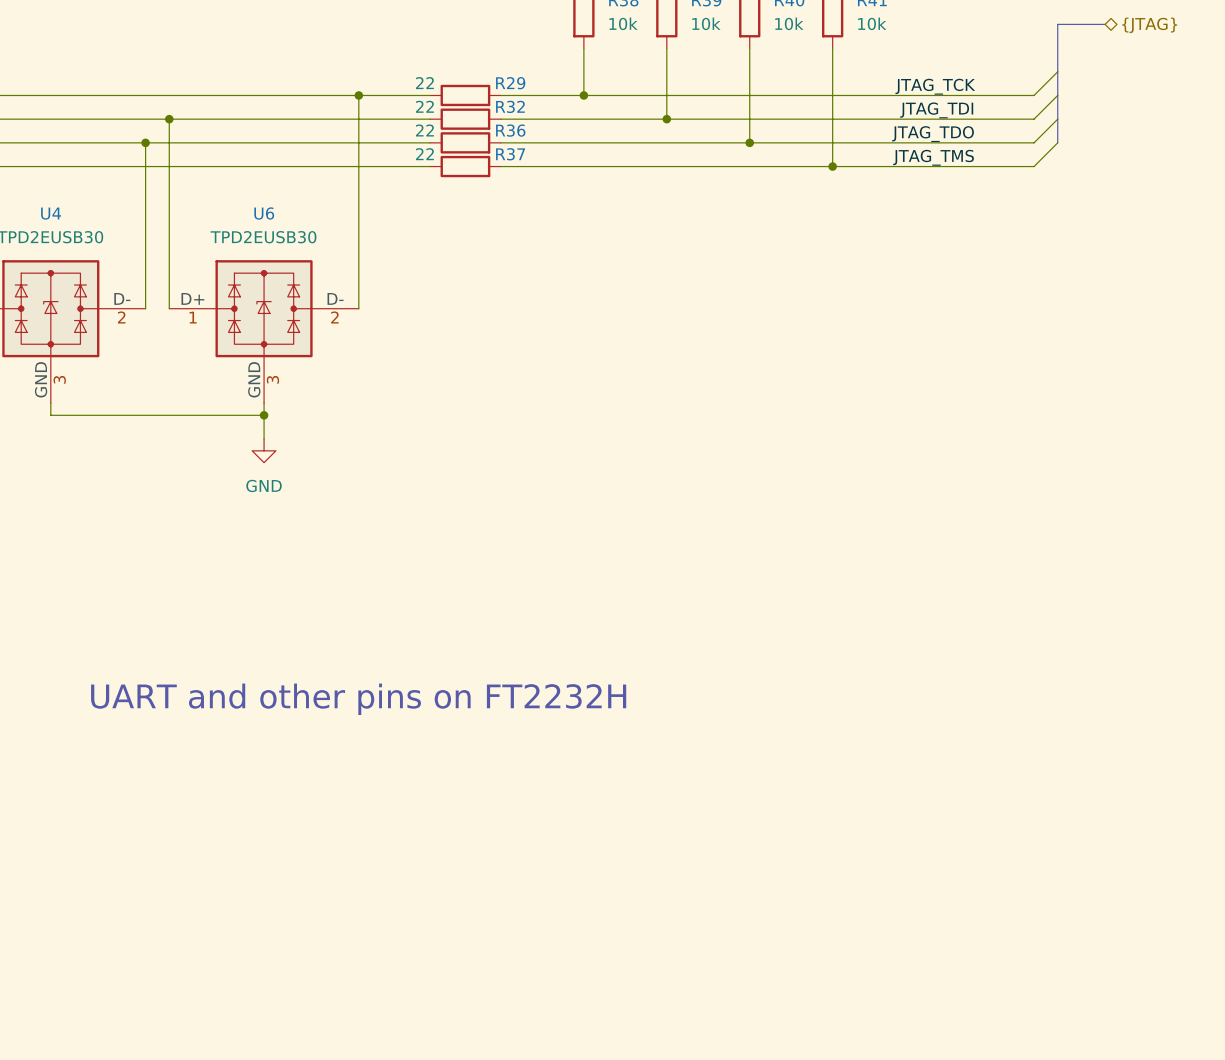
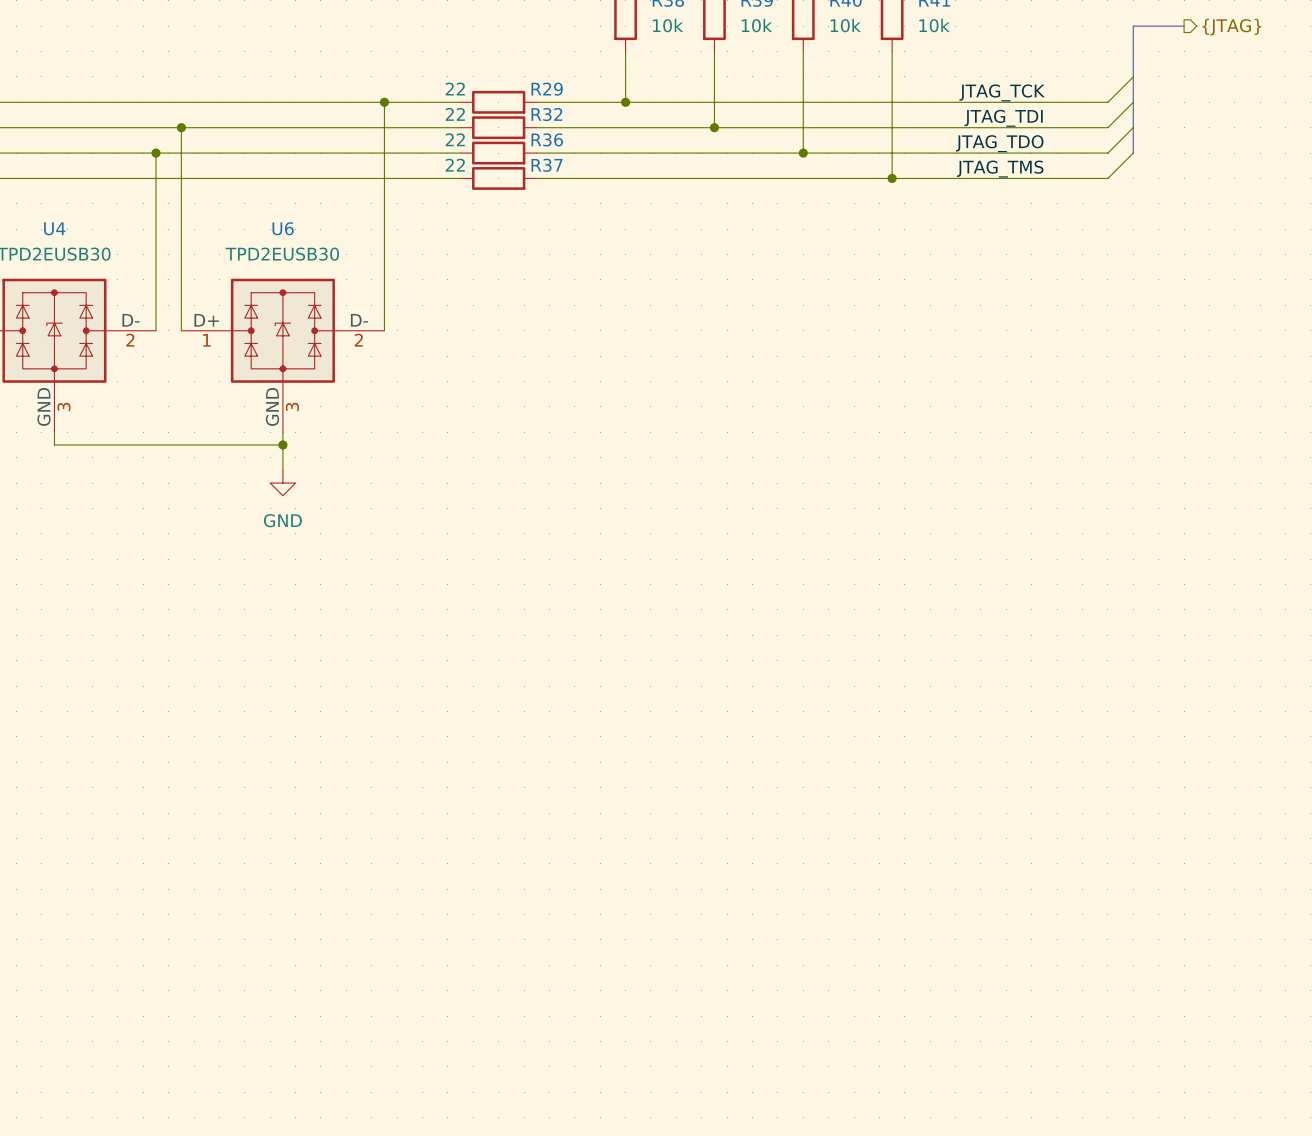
hierarchical label shape: bidirectional (1149, 25) -> output (1231, 27)
text: UART and other pins on FT2232H (358, 699) -> none

